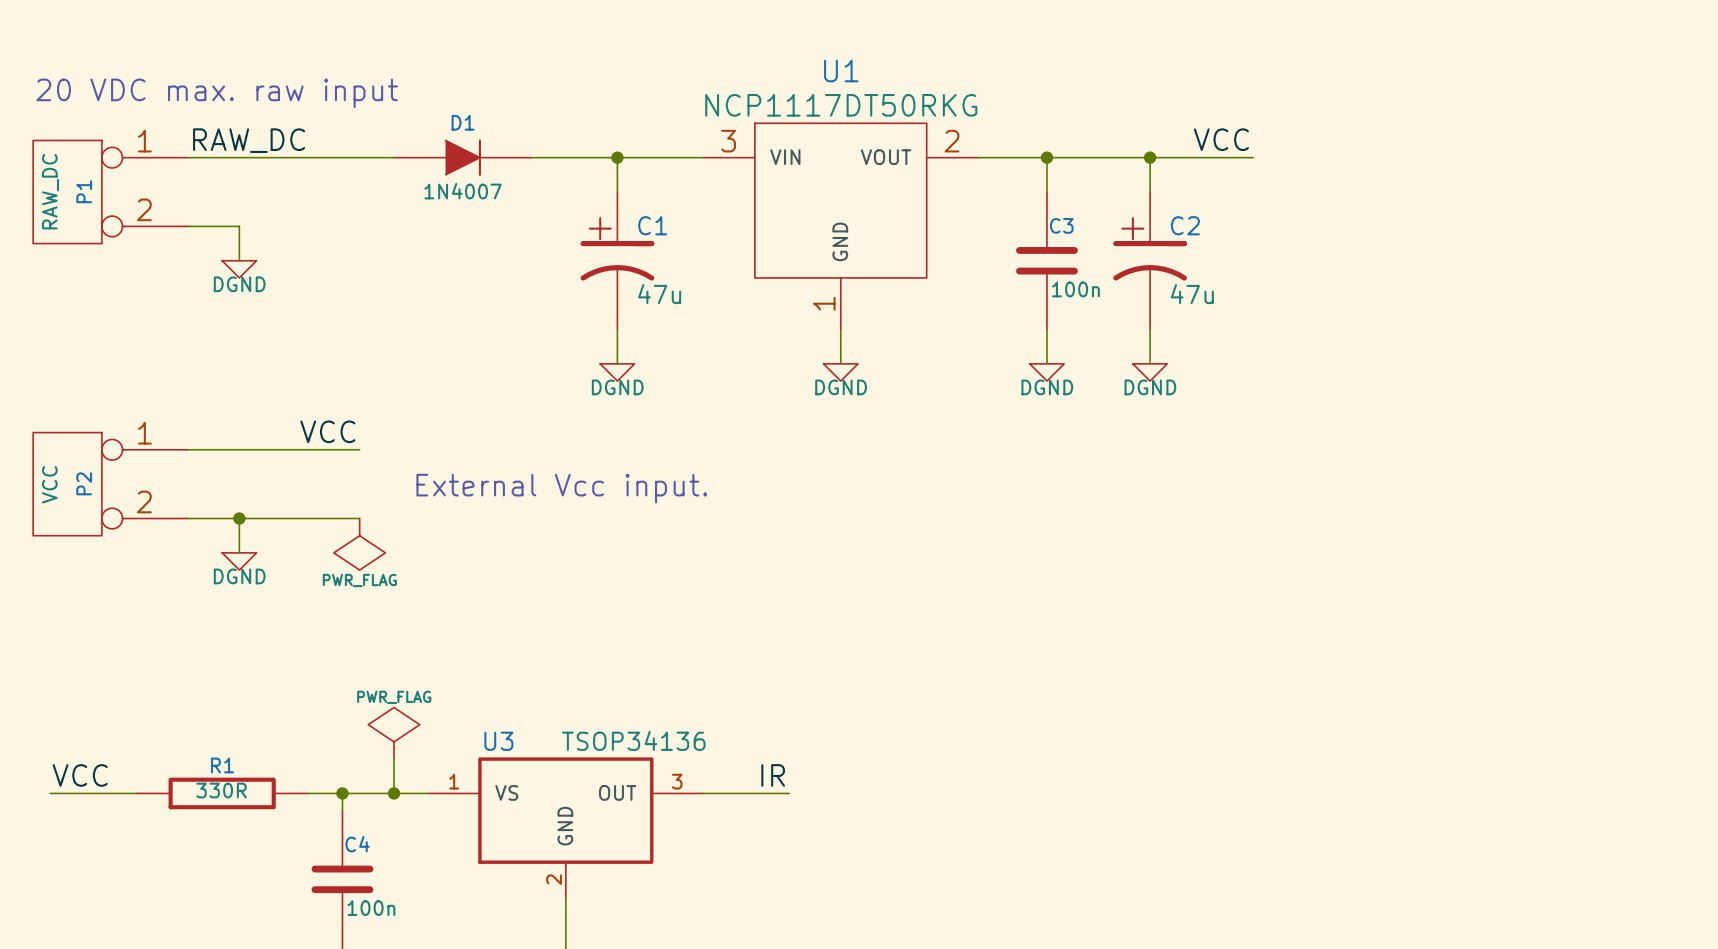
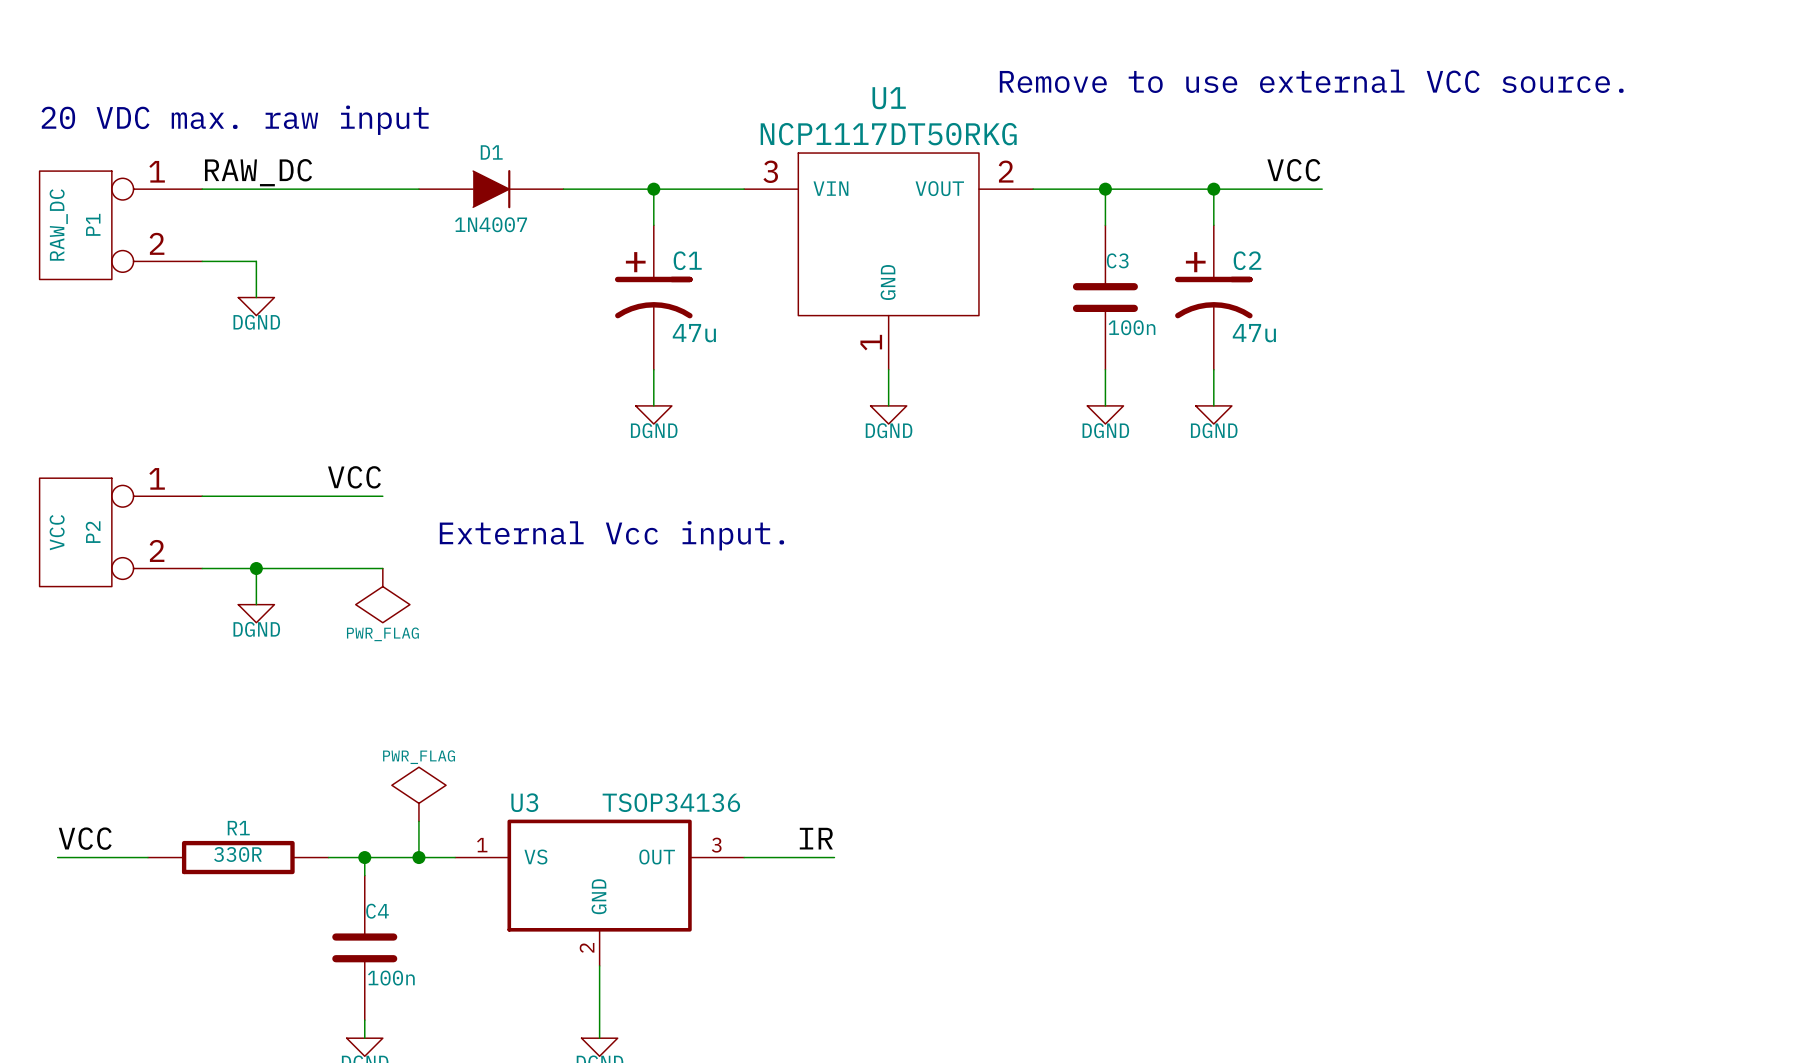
text: none -> Remove to use external VCC source. (1311, 81)

